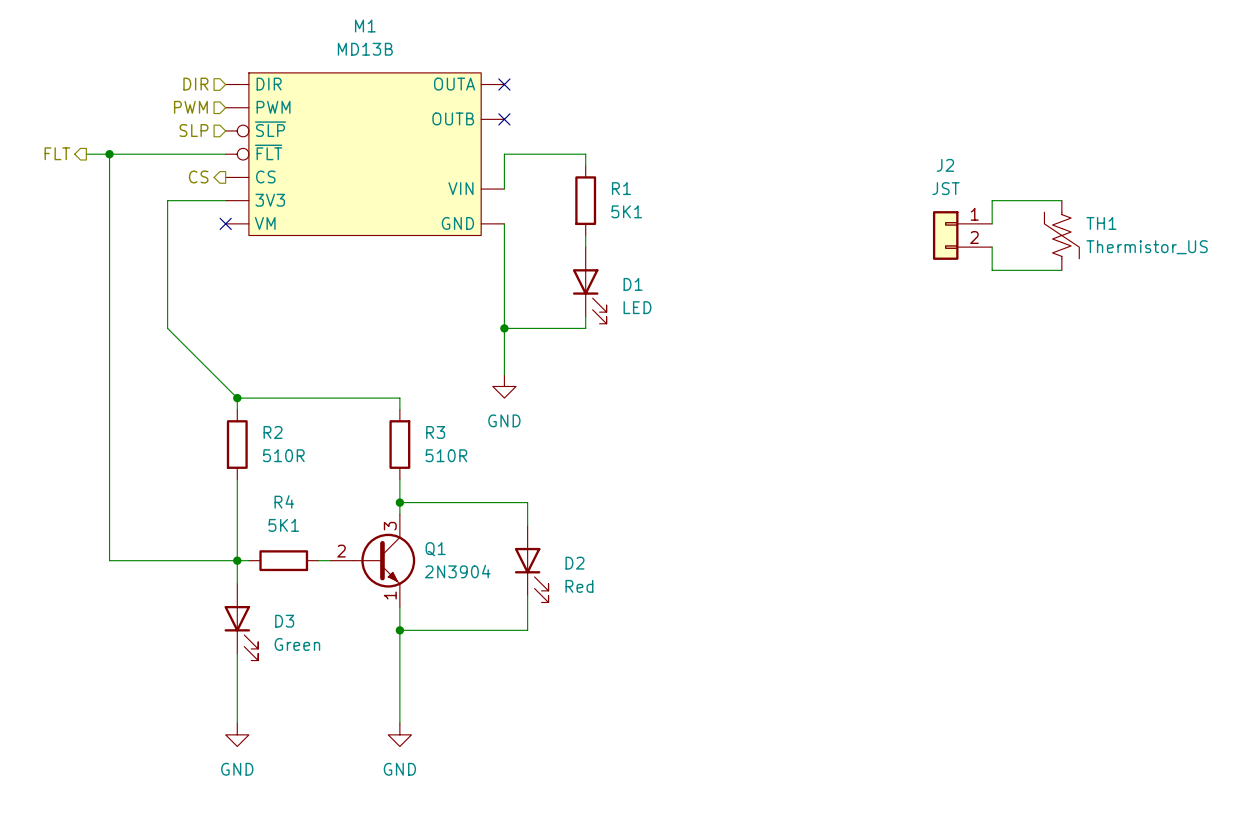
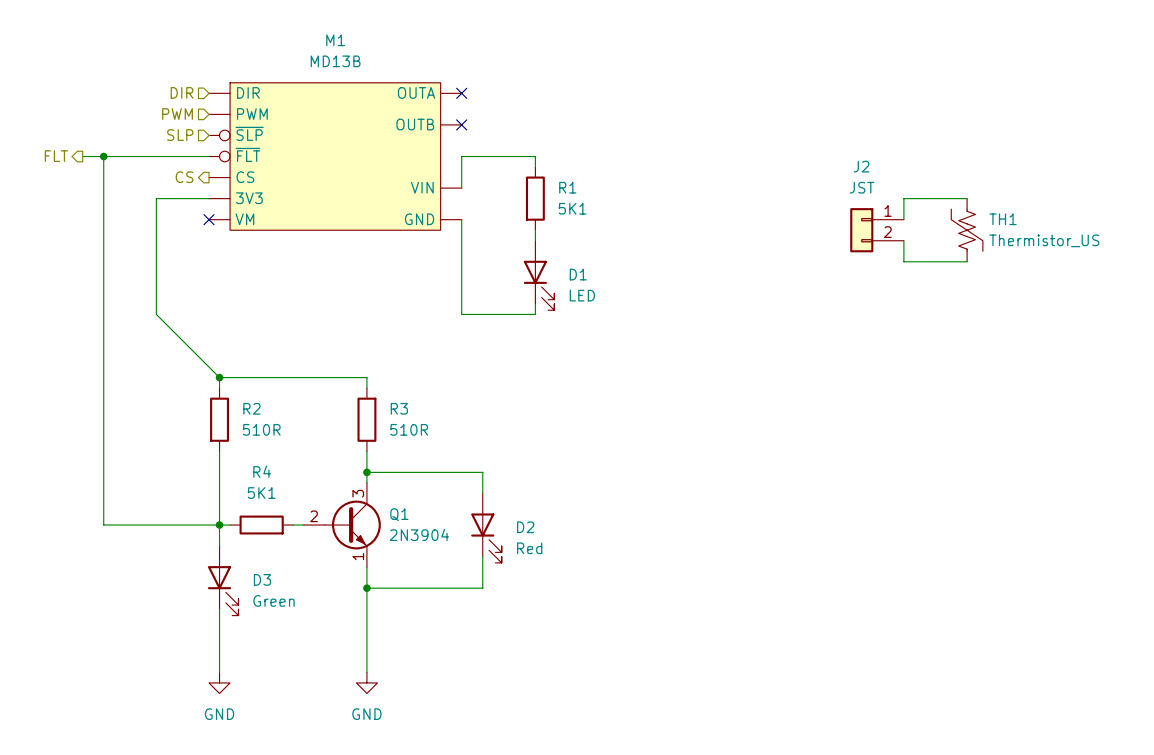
wire: (504, 328) (504, 374) -> none
junction: (504, 328) -> none
power symbol: GND (504, 386) -> none

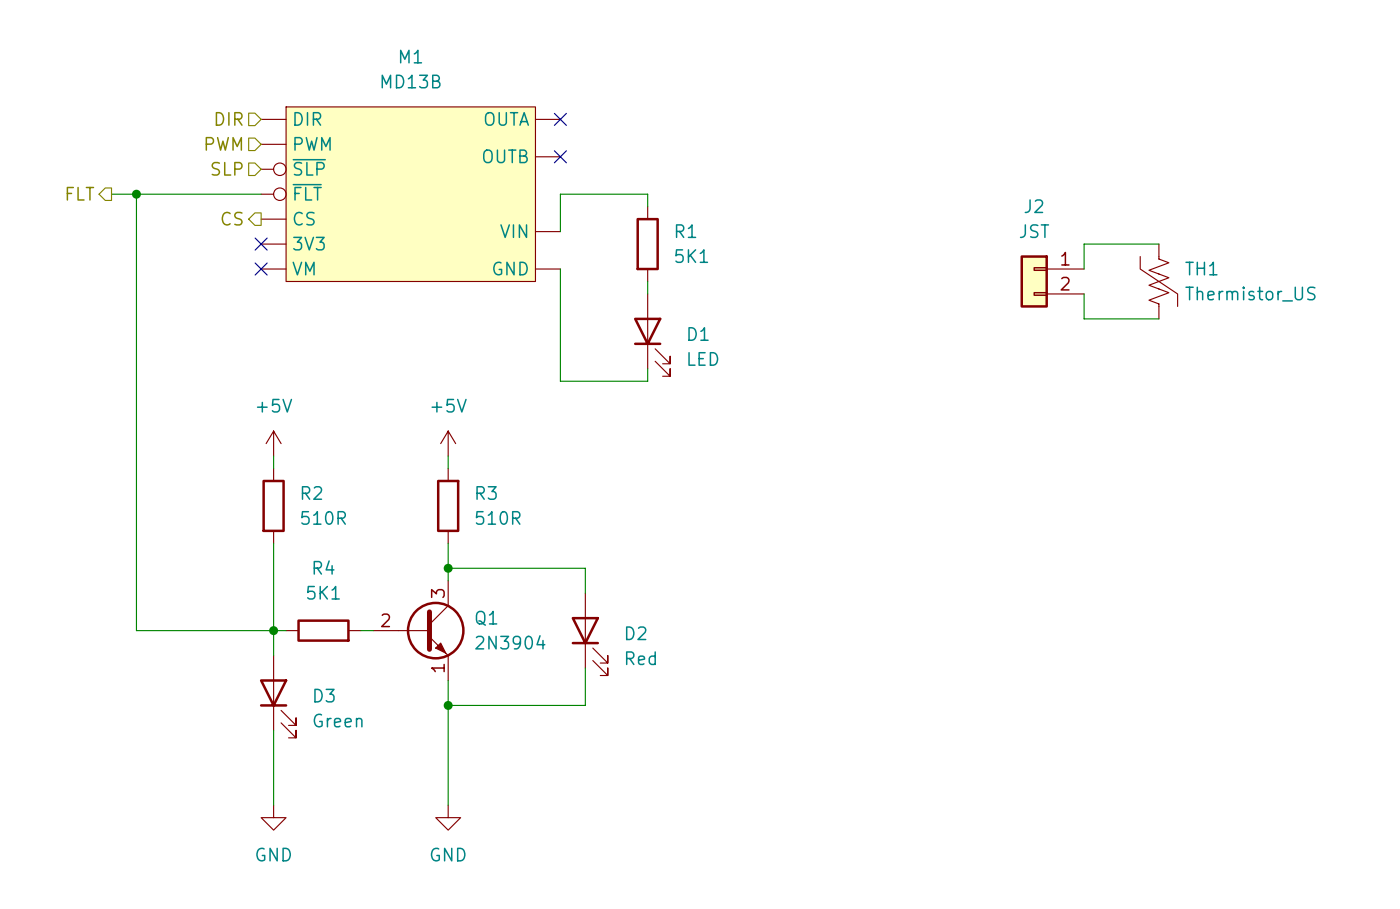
wire: (209, 198) (156, 198) (156, 314) (219, 377) (366, 377) -> none
no-connect mark: none -> (261, 244)
power symbol: none -> +5V (273, 443)
power symbol: none -> +5V (448, 443)
junction: (219, 377) -> none

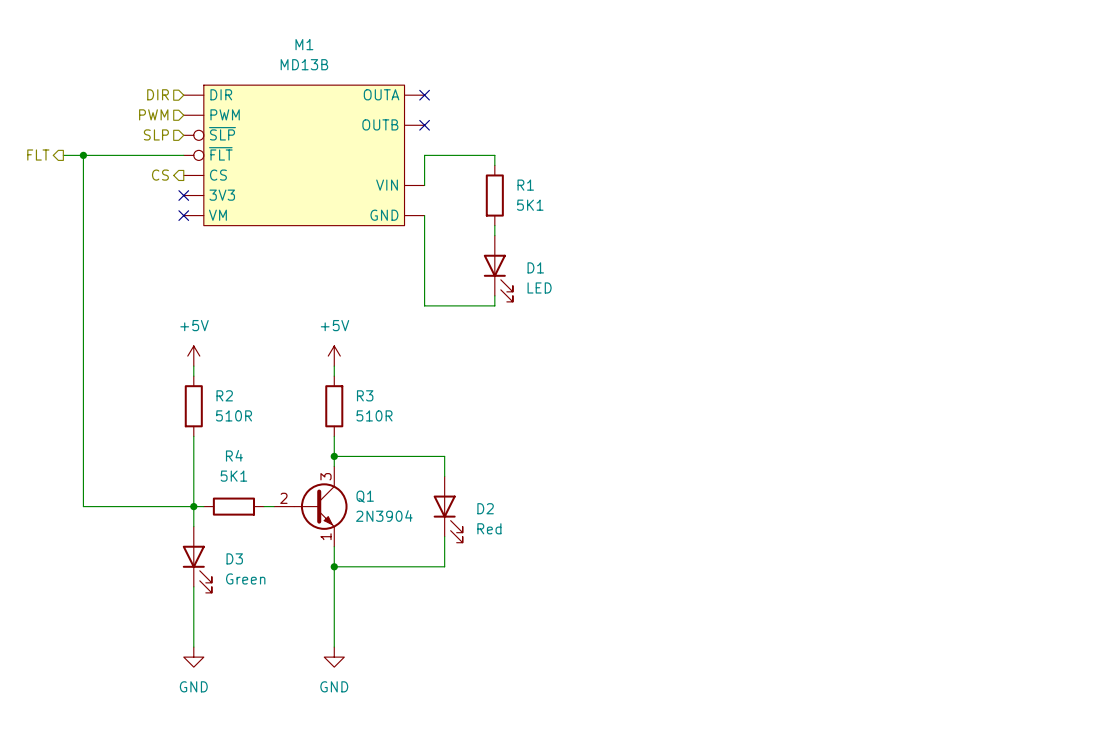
wire: (1158, 244) (1084, 244) (1084, 269) -> none
J2: JST (1052, 281) -> none
TH1: Thermistor_US (1158, 281) -> none
wire: (1084, 293) (1084, 318) (1158, 318) -> none

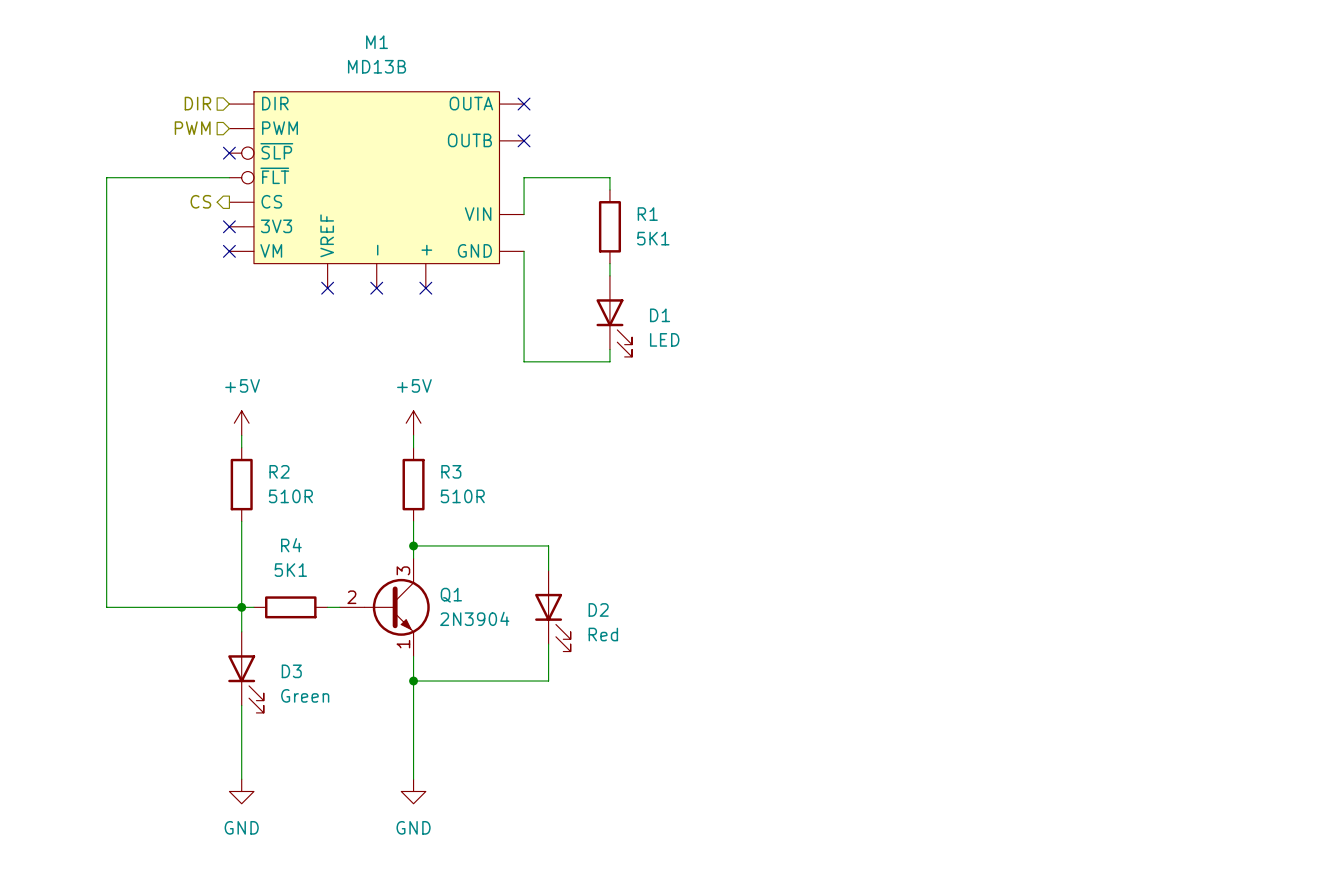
M1 symbol: [183, 85, 425, 226] -> [229, 91, 525, 289]
hierarchical label: SLP (156, 134) -> none
no-connect mark: none -> (229, 153)
hierarchical label: FLT (38, 155) -> none
wire: (63, 155) (83, 155) -> none
junction: (83, 155) -> none
no-connect mark: none -> (327, 288)
no-connect mark: none -> (376, 288)
no-connect mark: none -> (425, 288)

